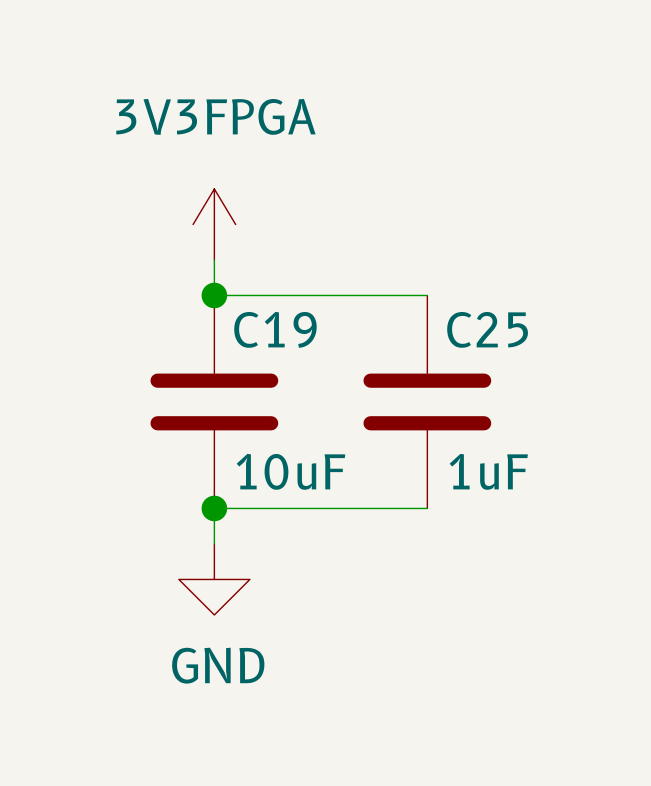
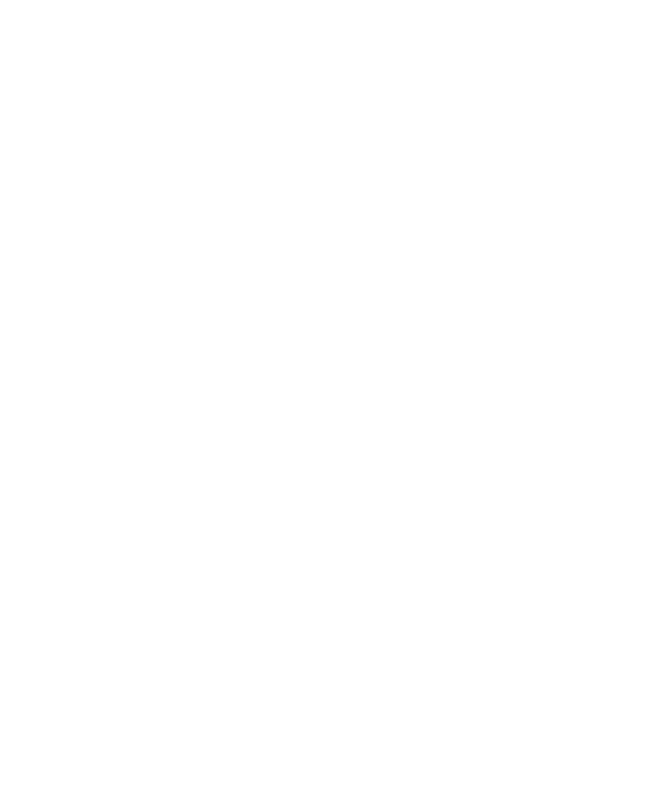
power symbol: 3V3FPGA (214, 224) -> none
wire: (214, 259) (214, 295) (427, 295) -> none
junction: (214, 295) -> none
C19: 10uF (214, 401) -> none
C25: 1uF (427, 401) -> none
junction: (214, 508) -> none
wire: (427, 508) (214, 508) (214, 543) -> none
power symbol: GND (214, 579) -> none

